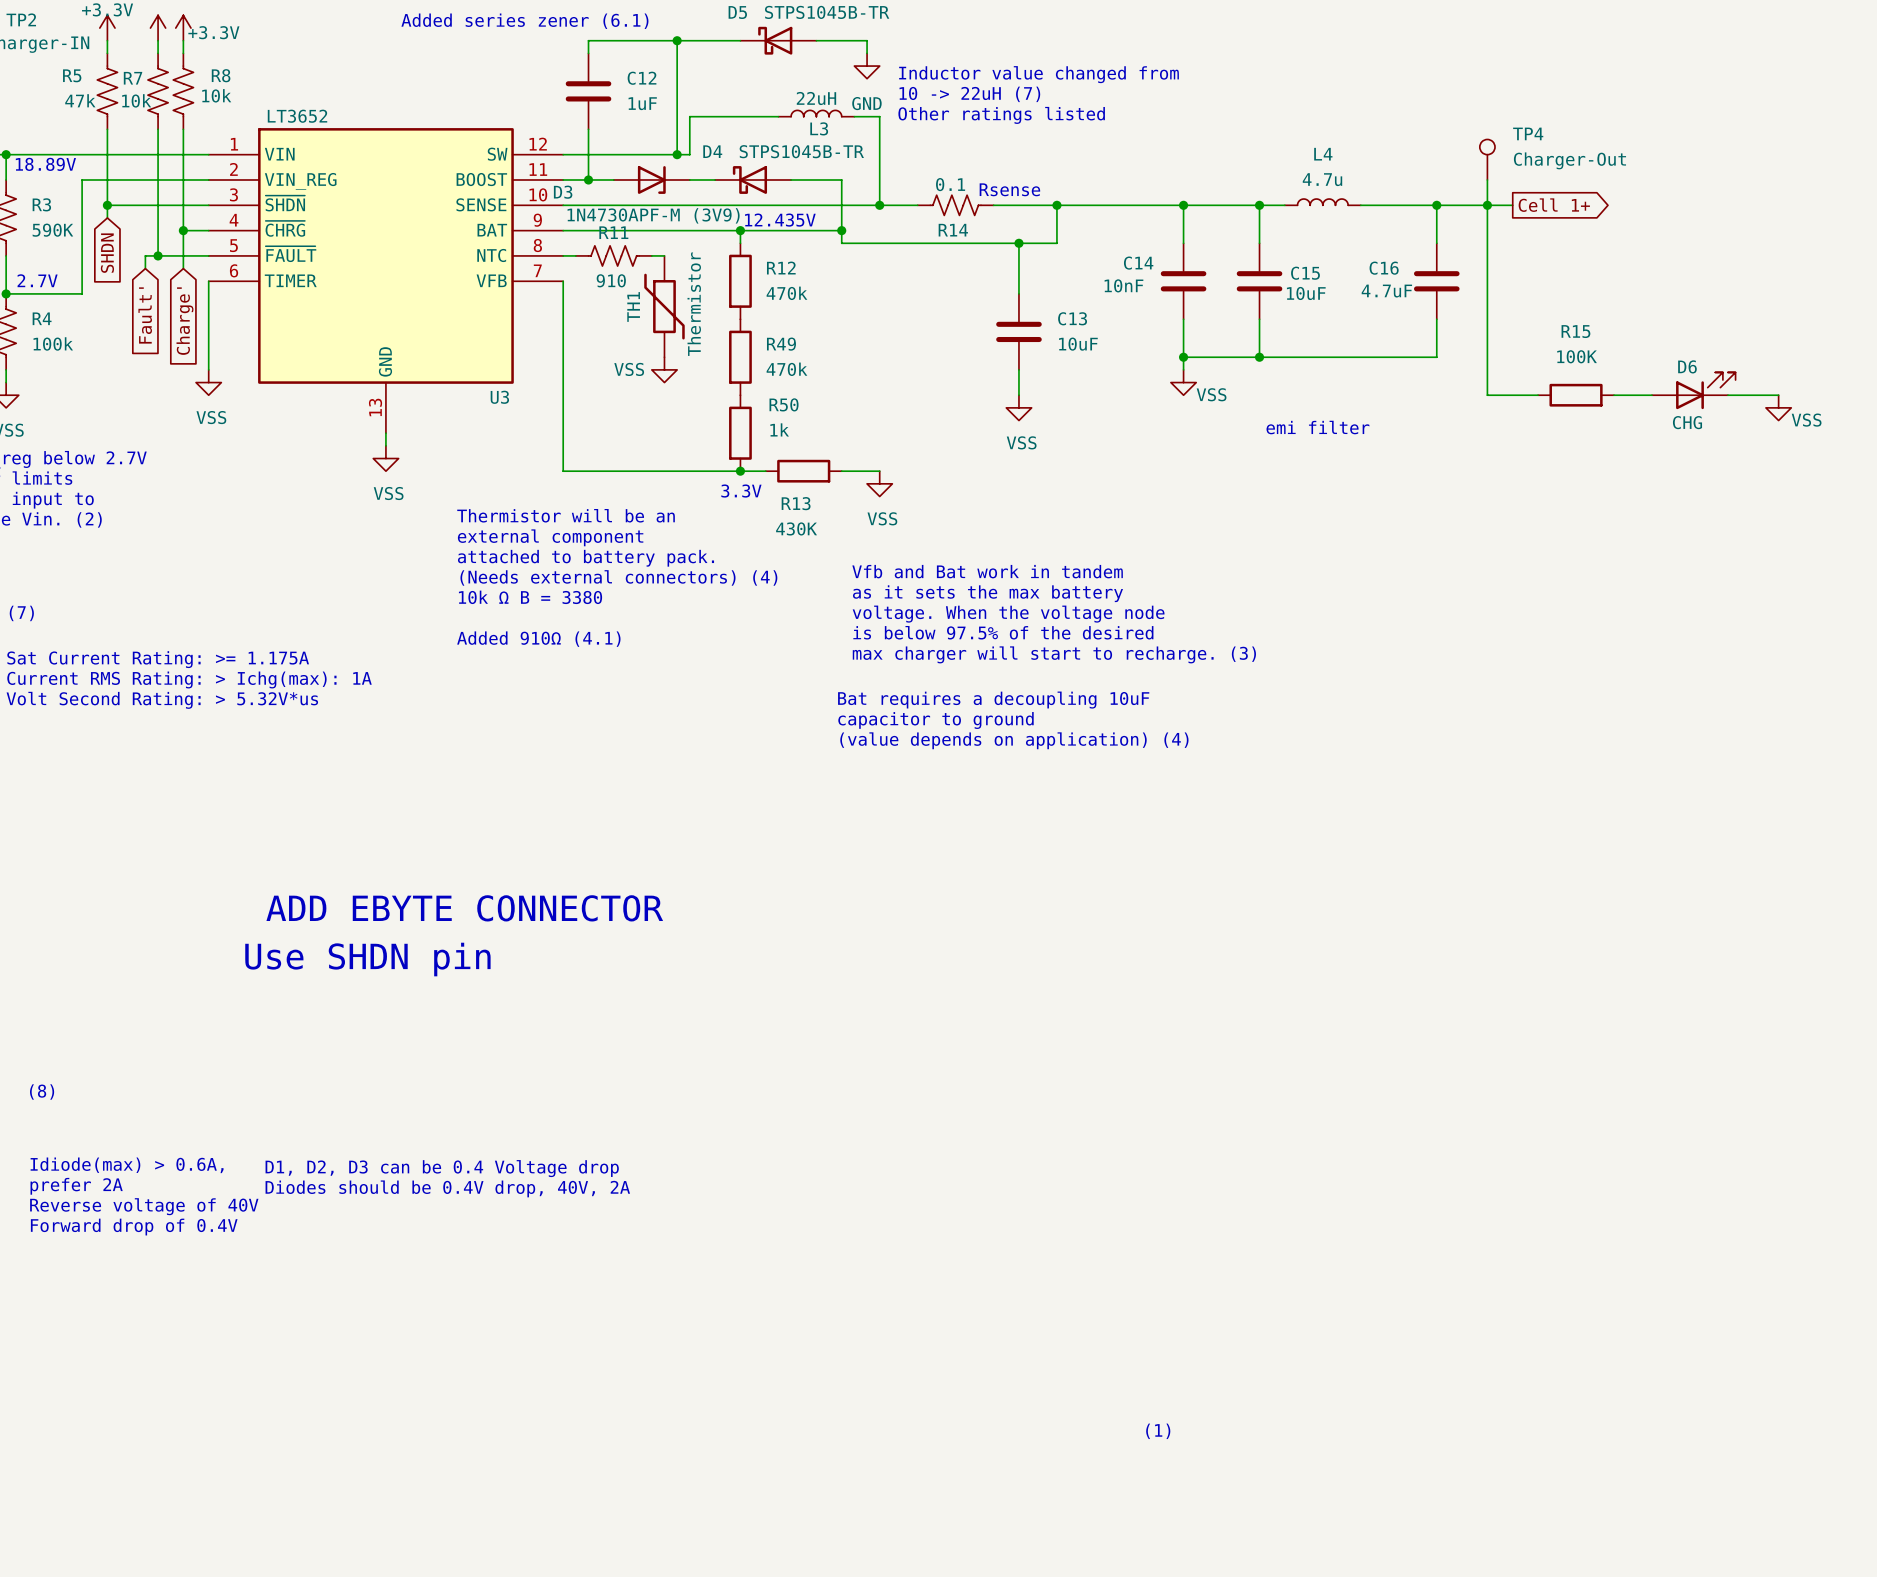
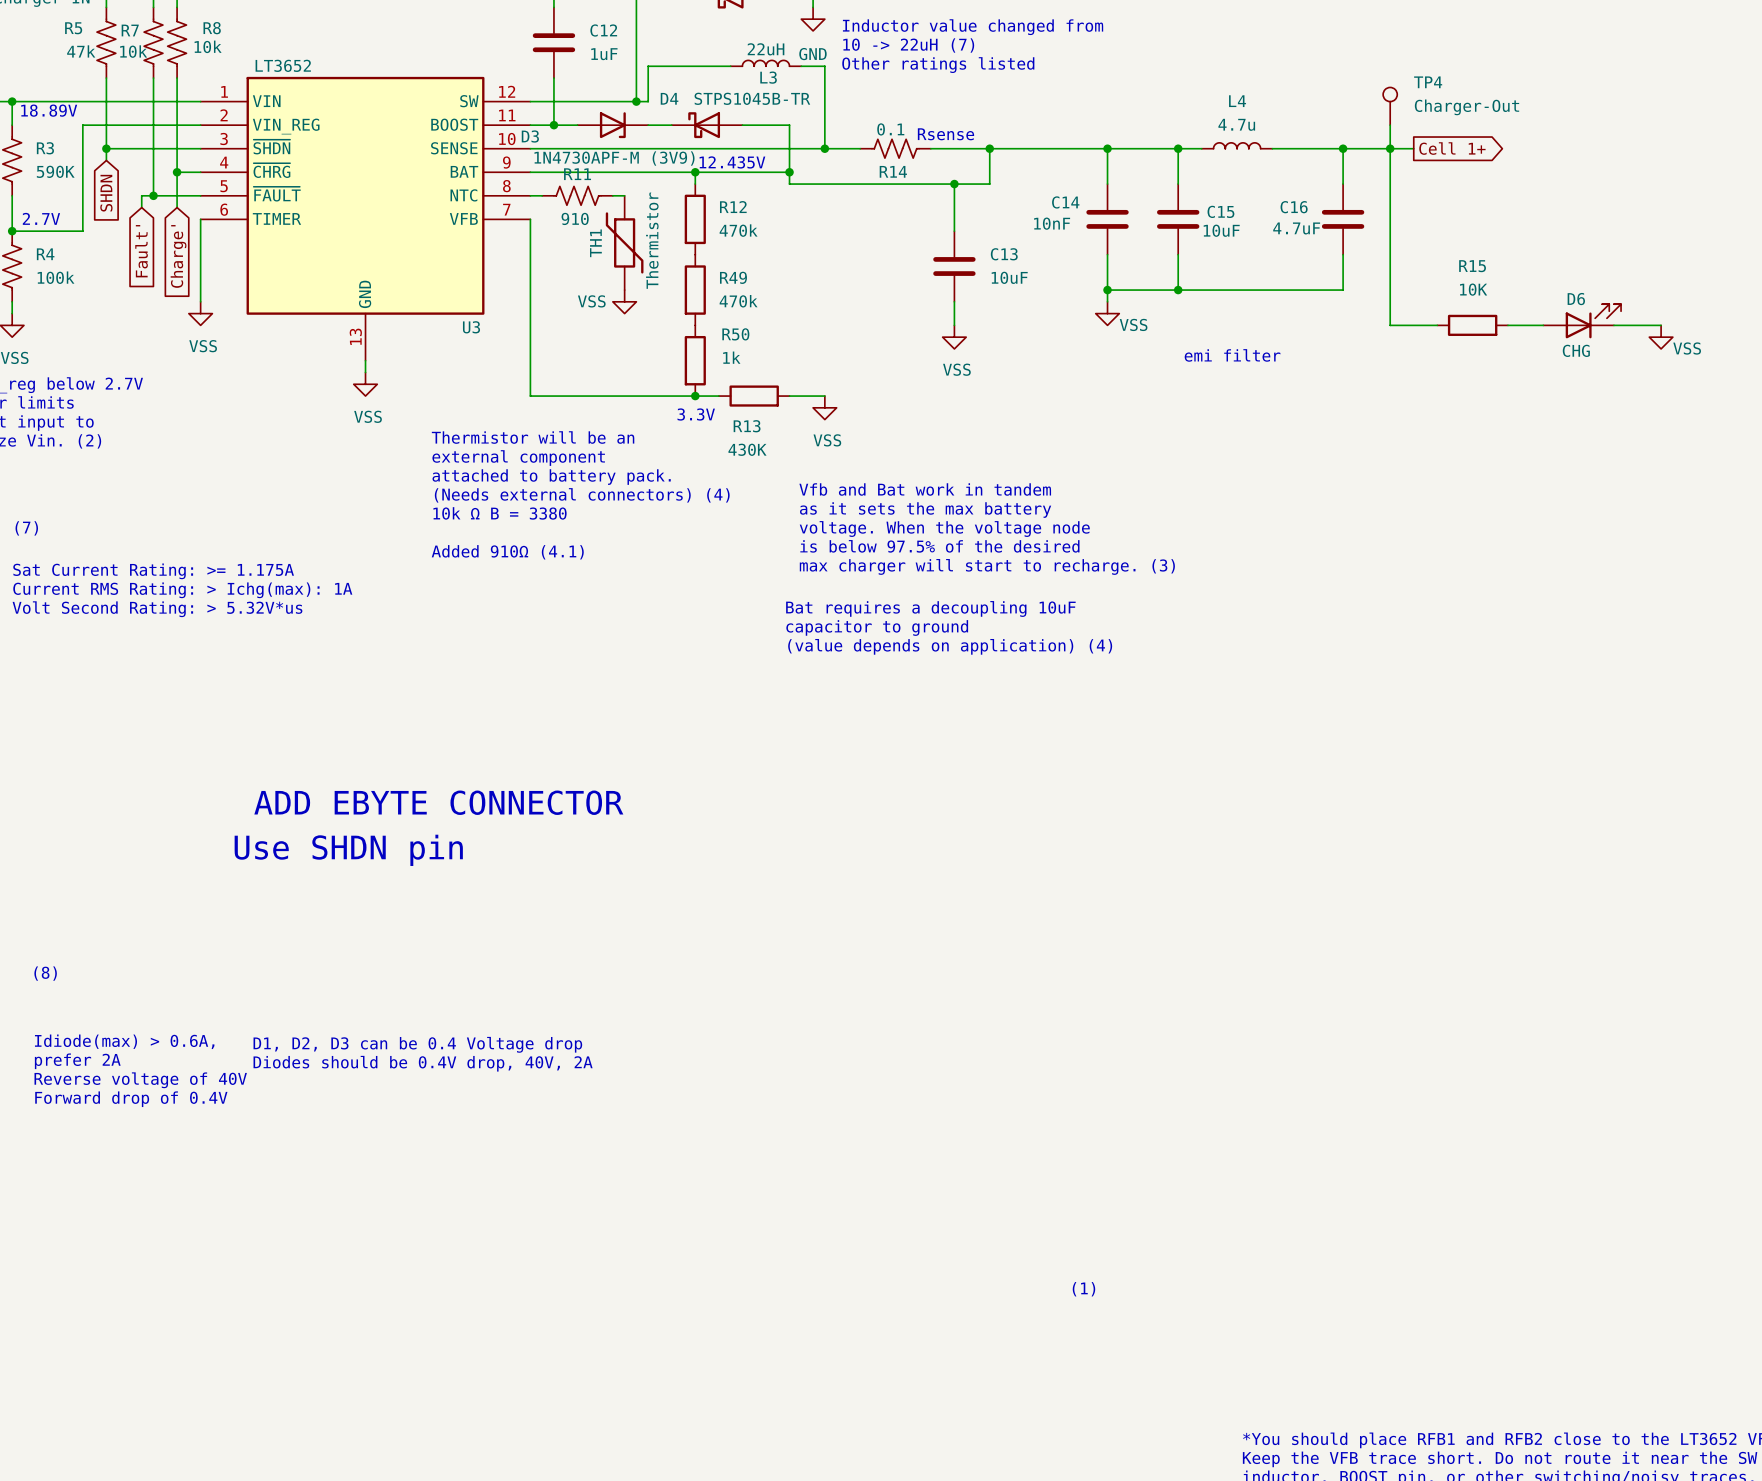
R15 value: 100K (1577, 356) -> 10K (1473, 289)

